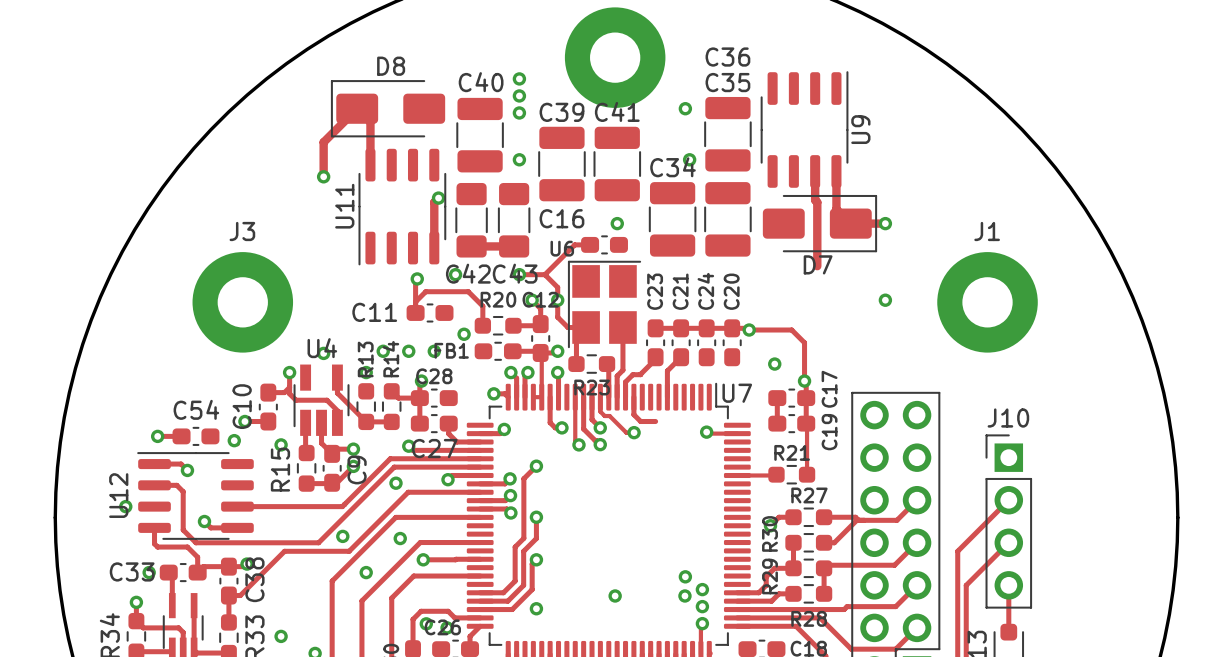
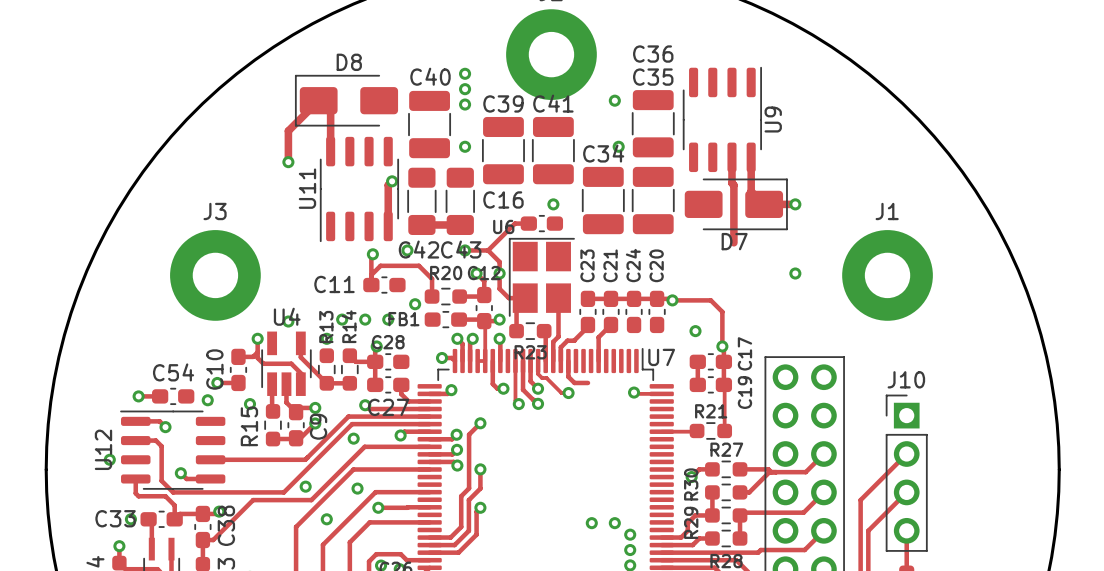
via: none -> (591, 523)
via: (615, 595) -> none
via: (684, 595) -> none
via: (536, 608) -> none

